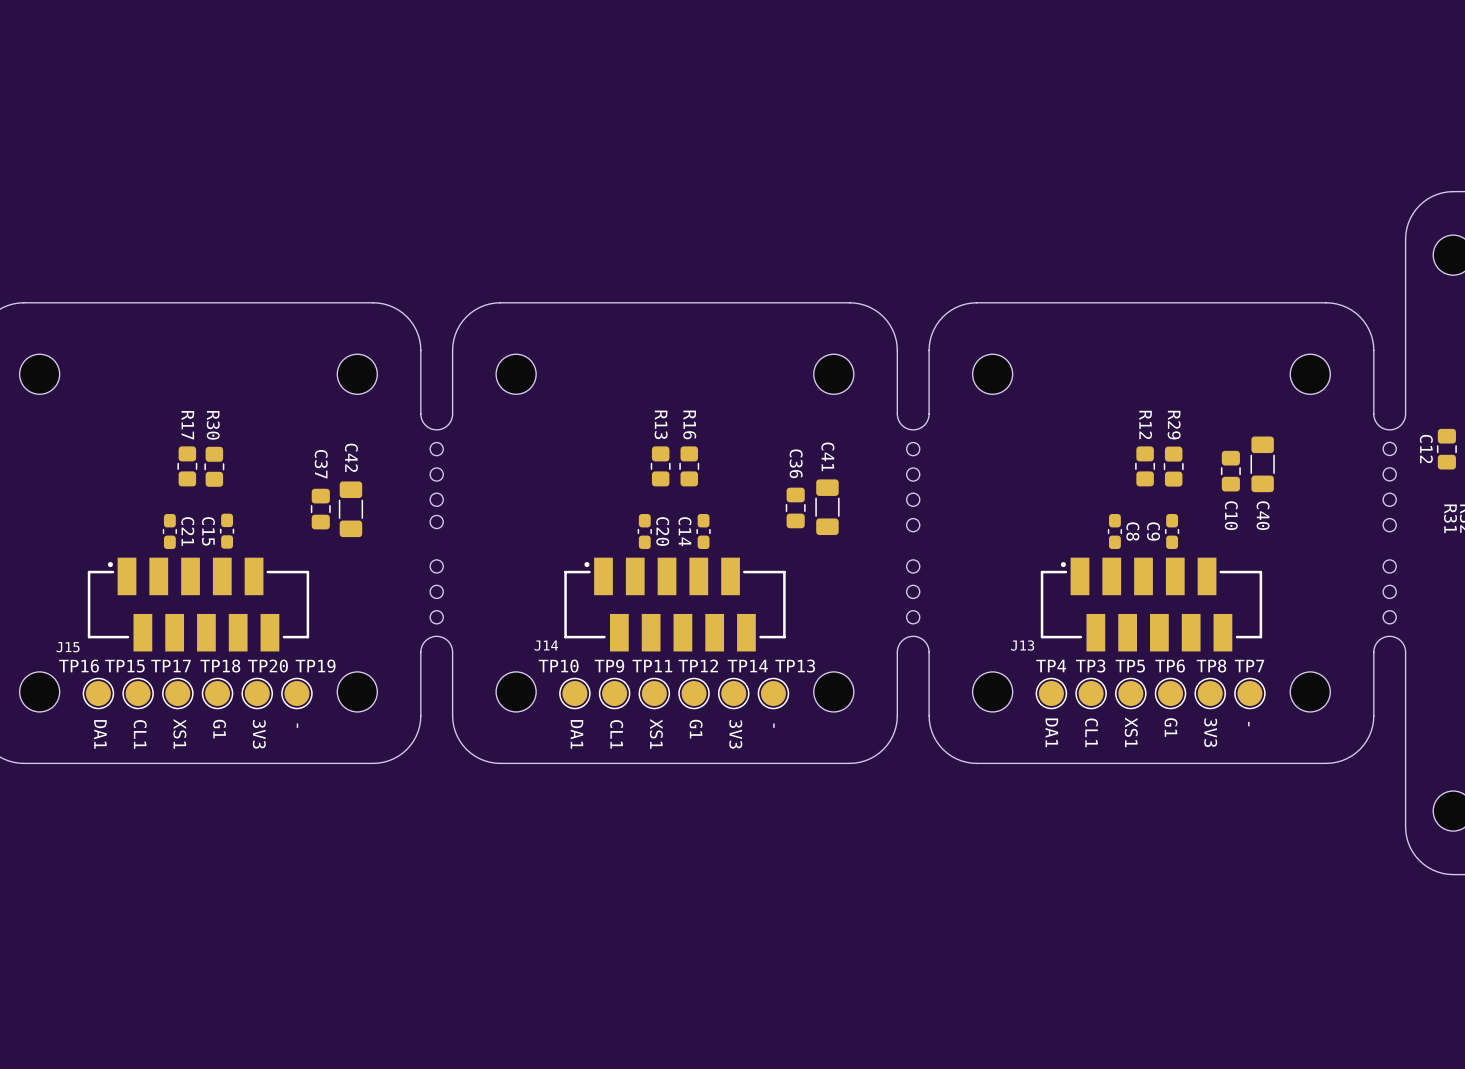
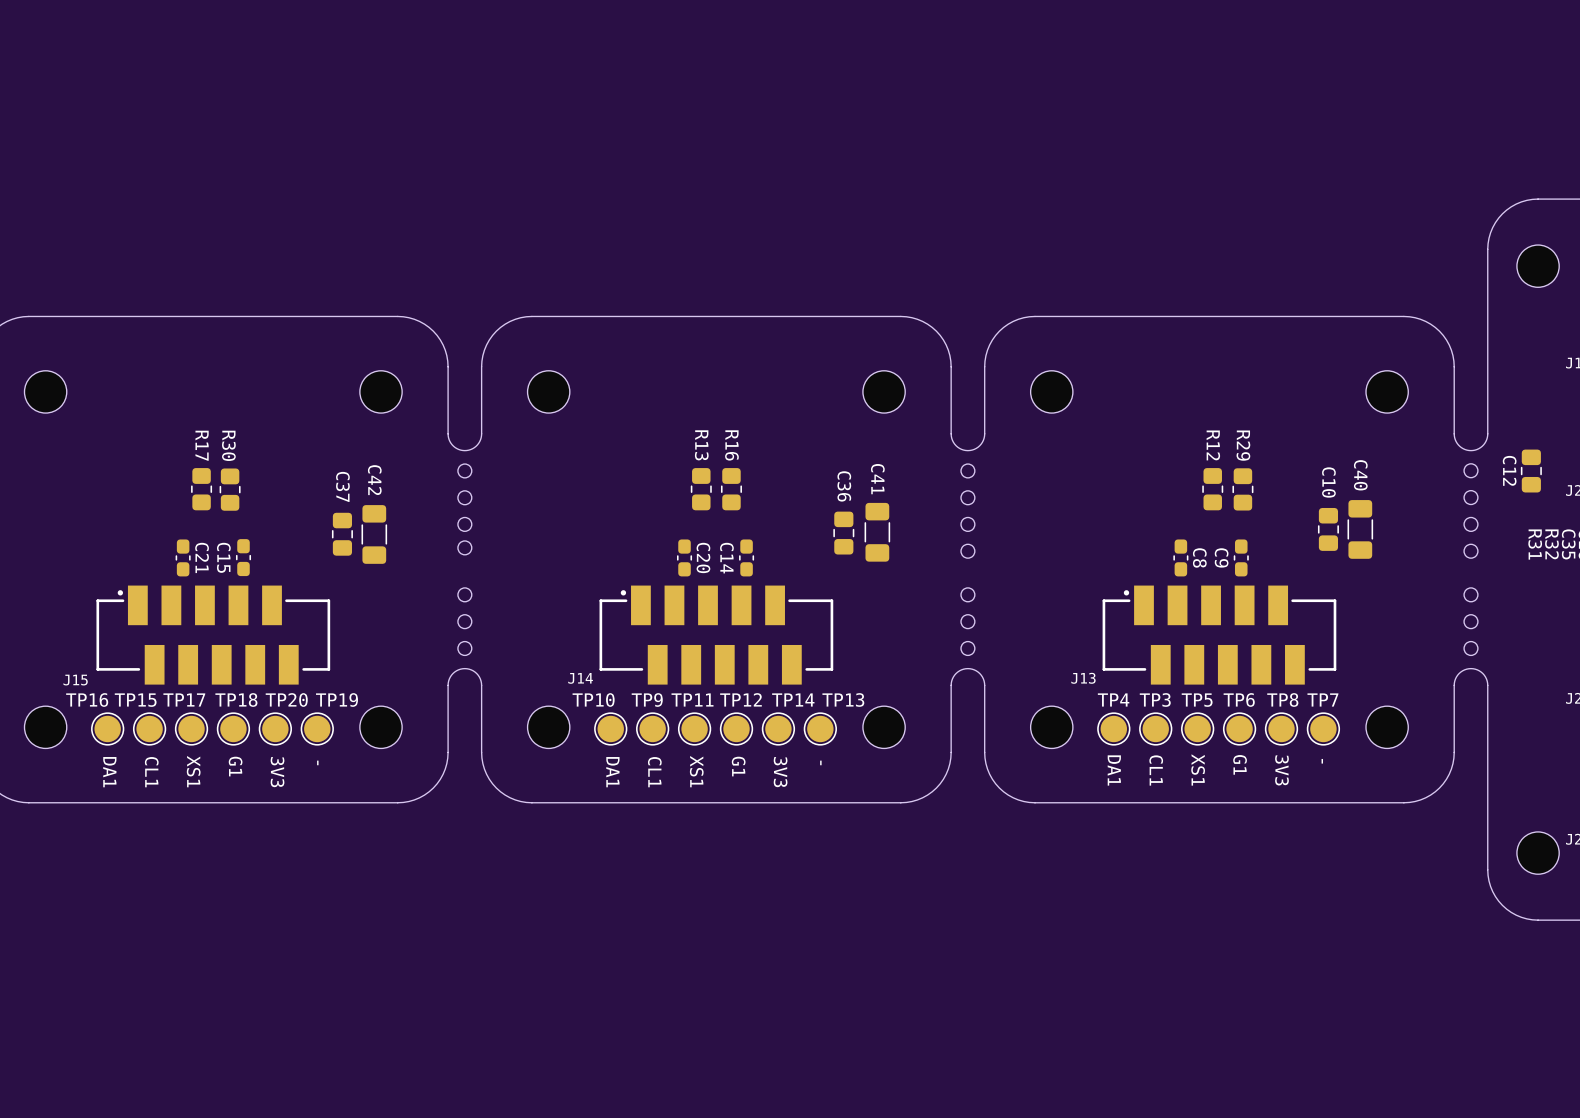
C40 position: (1262, 464) -> (1360, 529)
C10 position: (1230, 471) -> (1328, 529)
C10 name position: C10 (1231, 515) -> C10 (1328, 482)
C40 name position: C40 (1263, 515) -> C40 (1360, 475)

